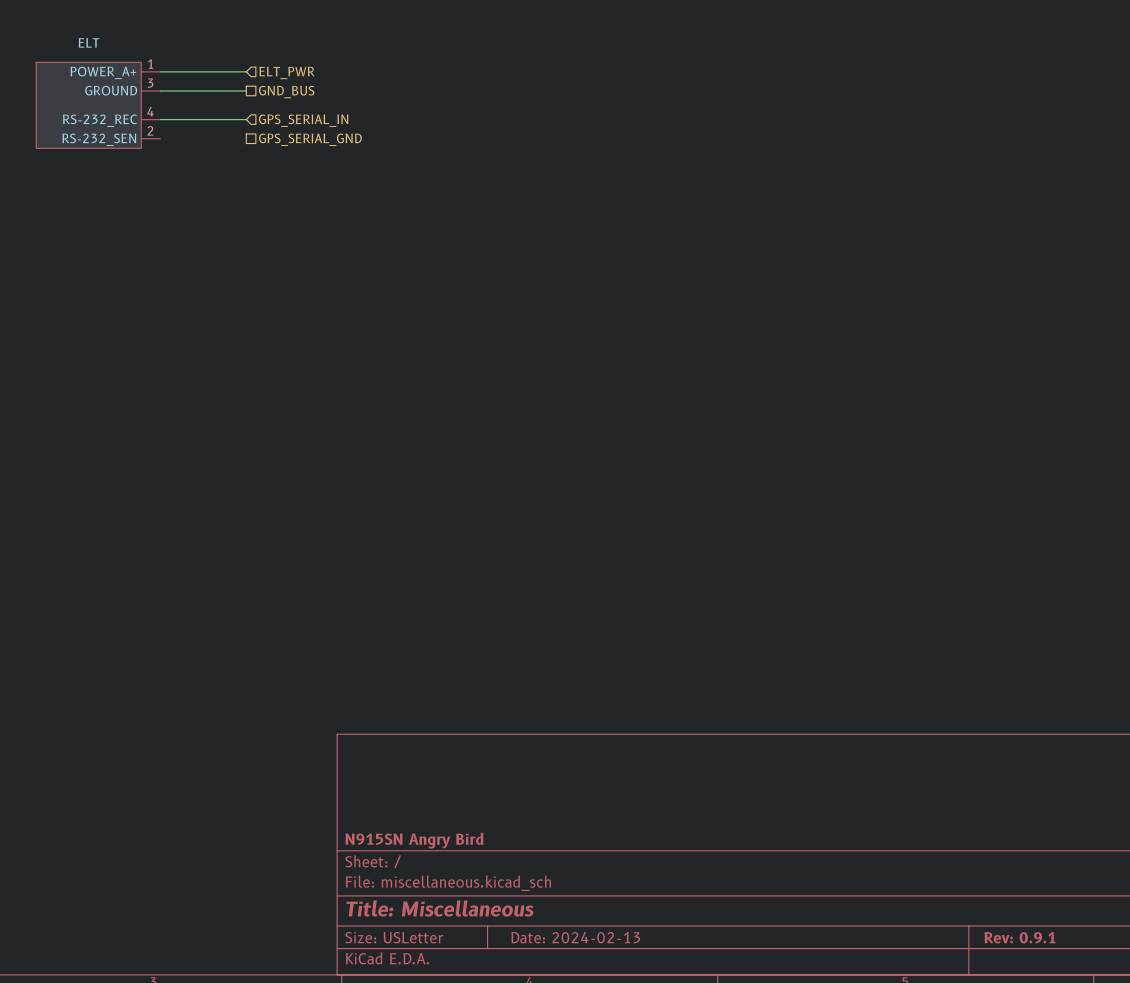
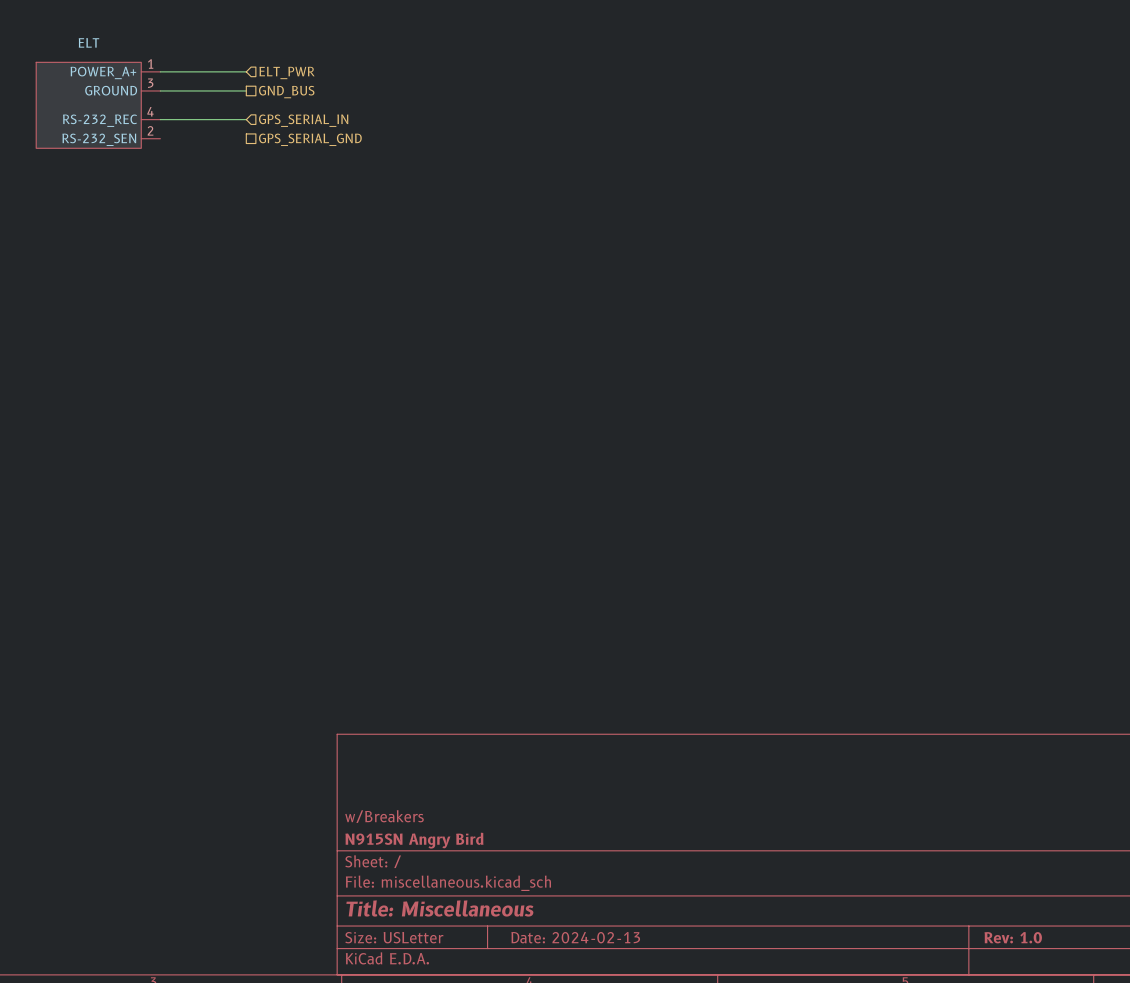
title block: none -> w/Breakers (384, 816)
title block: Rev: 0.9.1 (1020, 937) -> Rev: 1.0 (1013, 937)

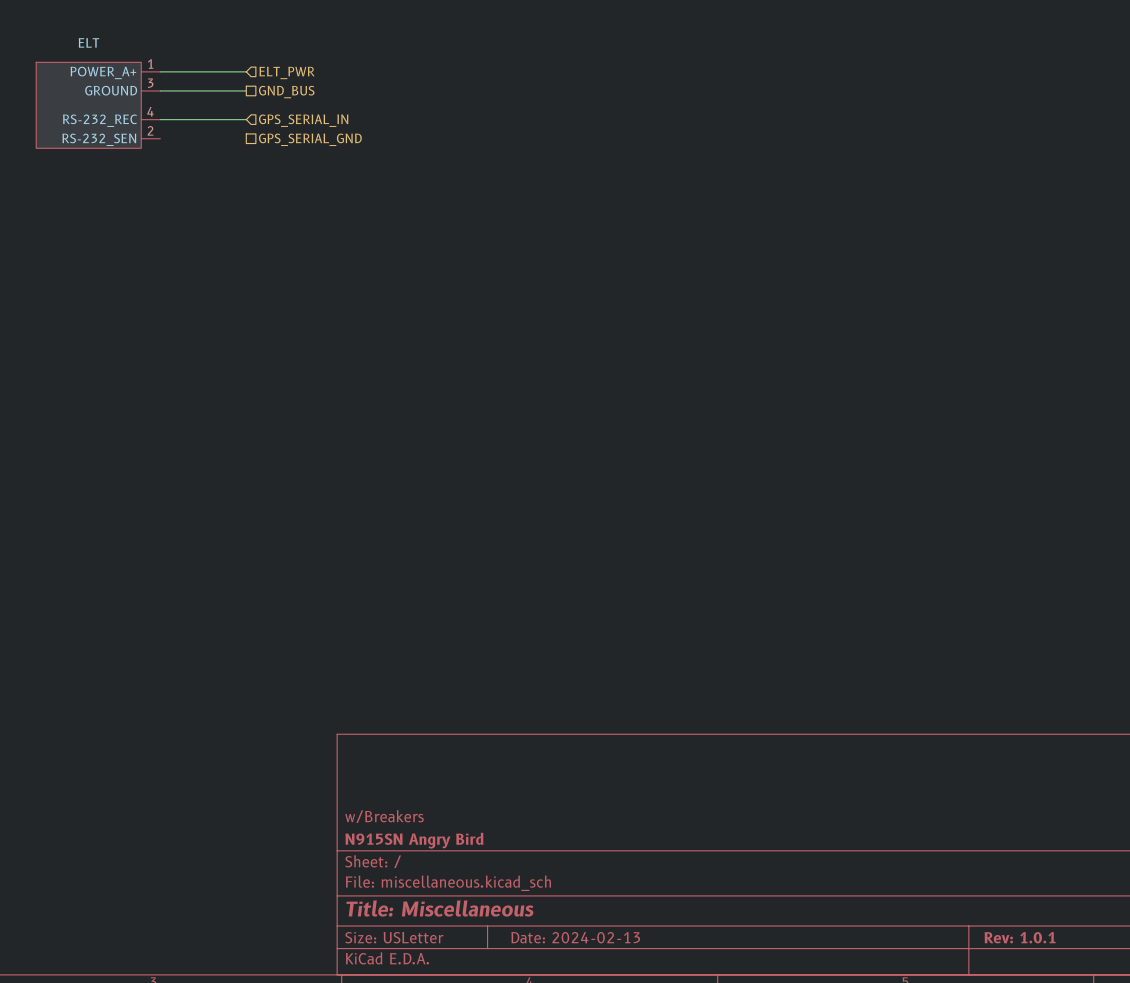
title block: Rev: 1.0 (1013, 937) -> Rev: 1.0.1 (1020, 937)

